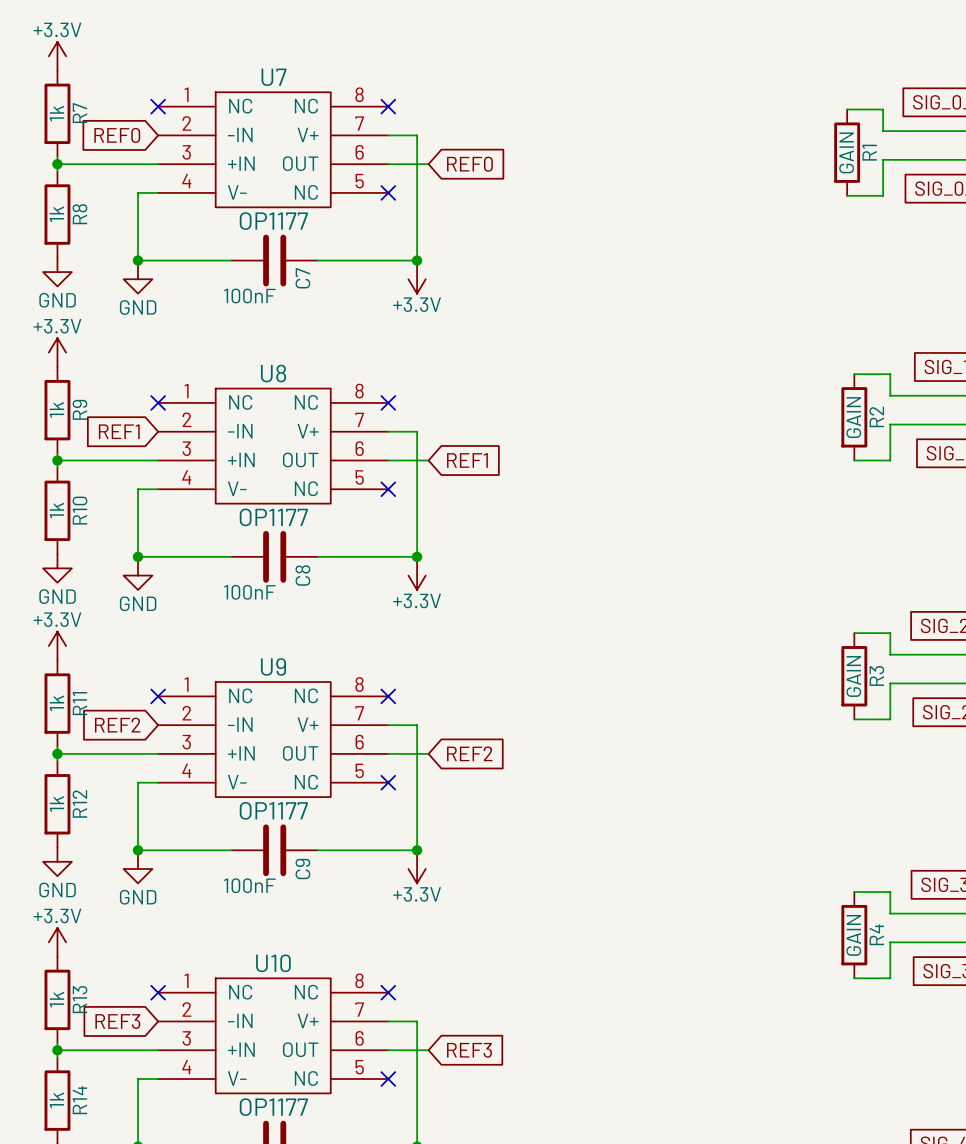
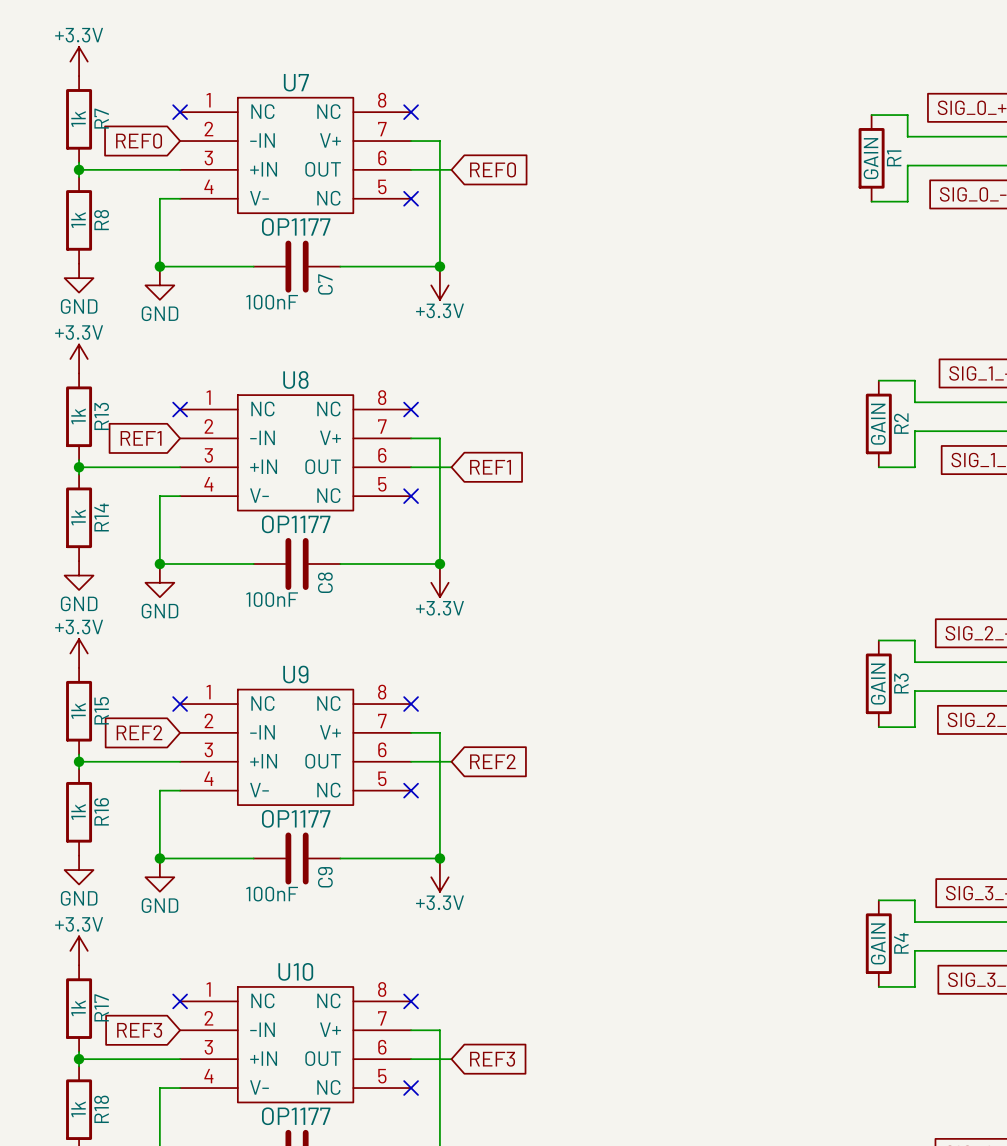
R9 name: R9 (79, 409) -> R13 (101, 416)
R10 name: R10 (79, 510) -> R14 (101, 517)
R11 name: R11 (79, 703) -> R15 (101, 710)
R12 name: R12 (79, 803) -> R16 (101, 811)
R13 name: R13 (80, 999) -> R17 (101, 1007)
R14 name: R14 (79, 1100) -> R18 (101, 1109)

